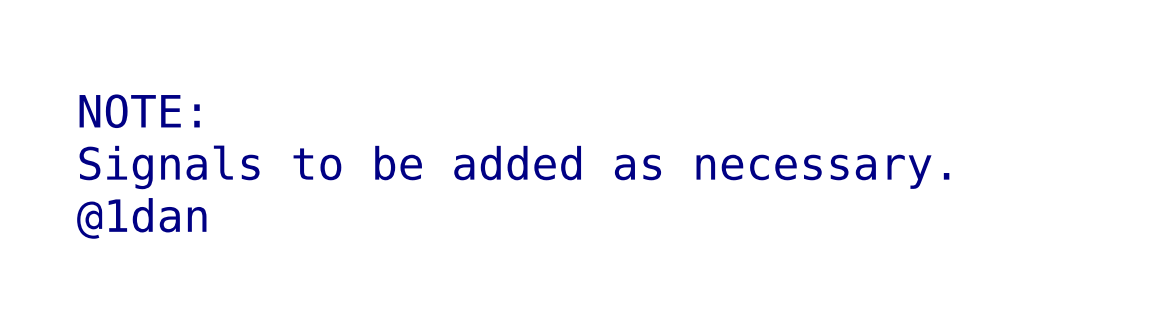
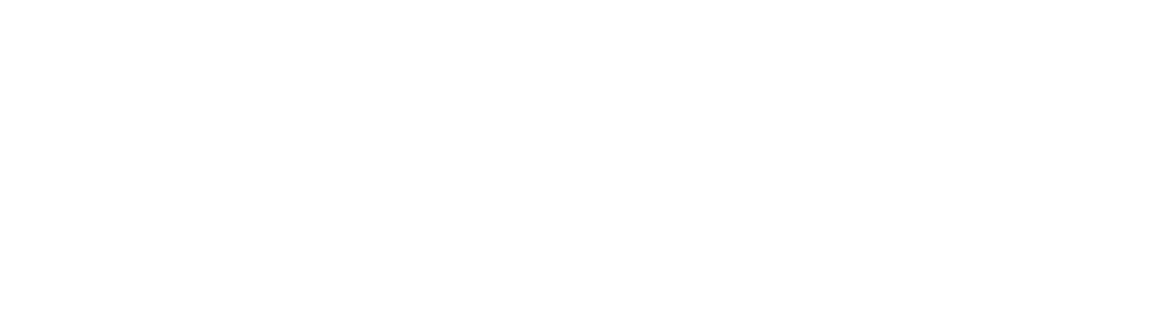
text: NOTE: (139, 111) -> none
text: Signals to be added as necessary. (514, 167) -> none
text: @1dan (141, 218) -> none

